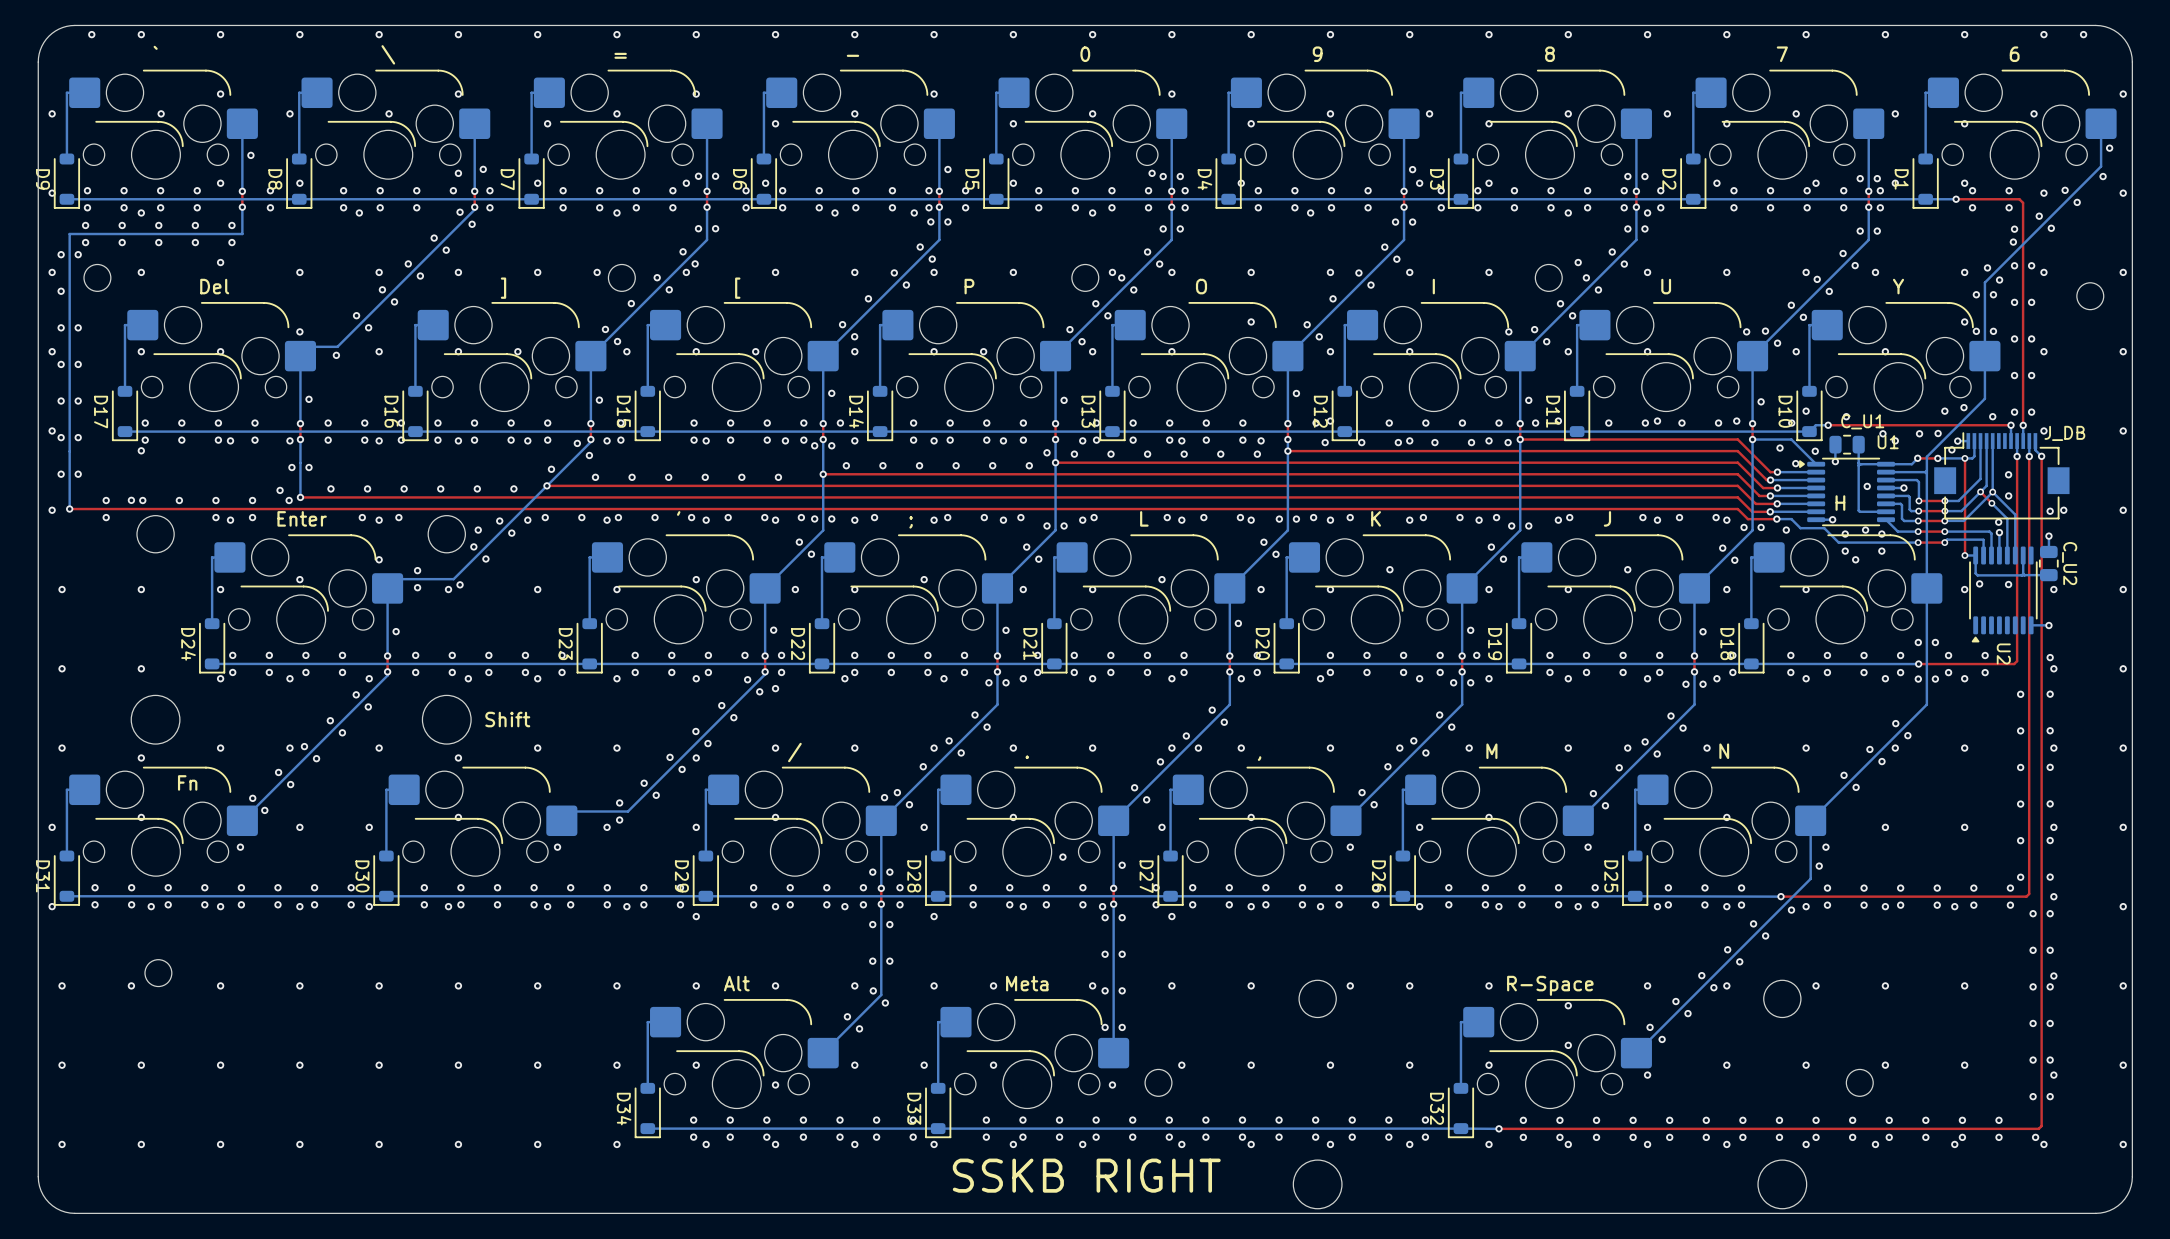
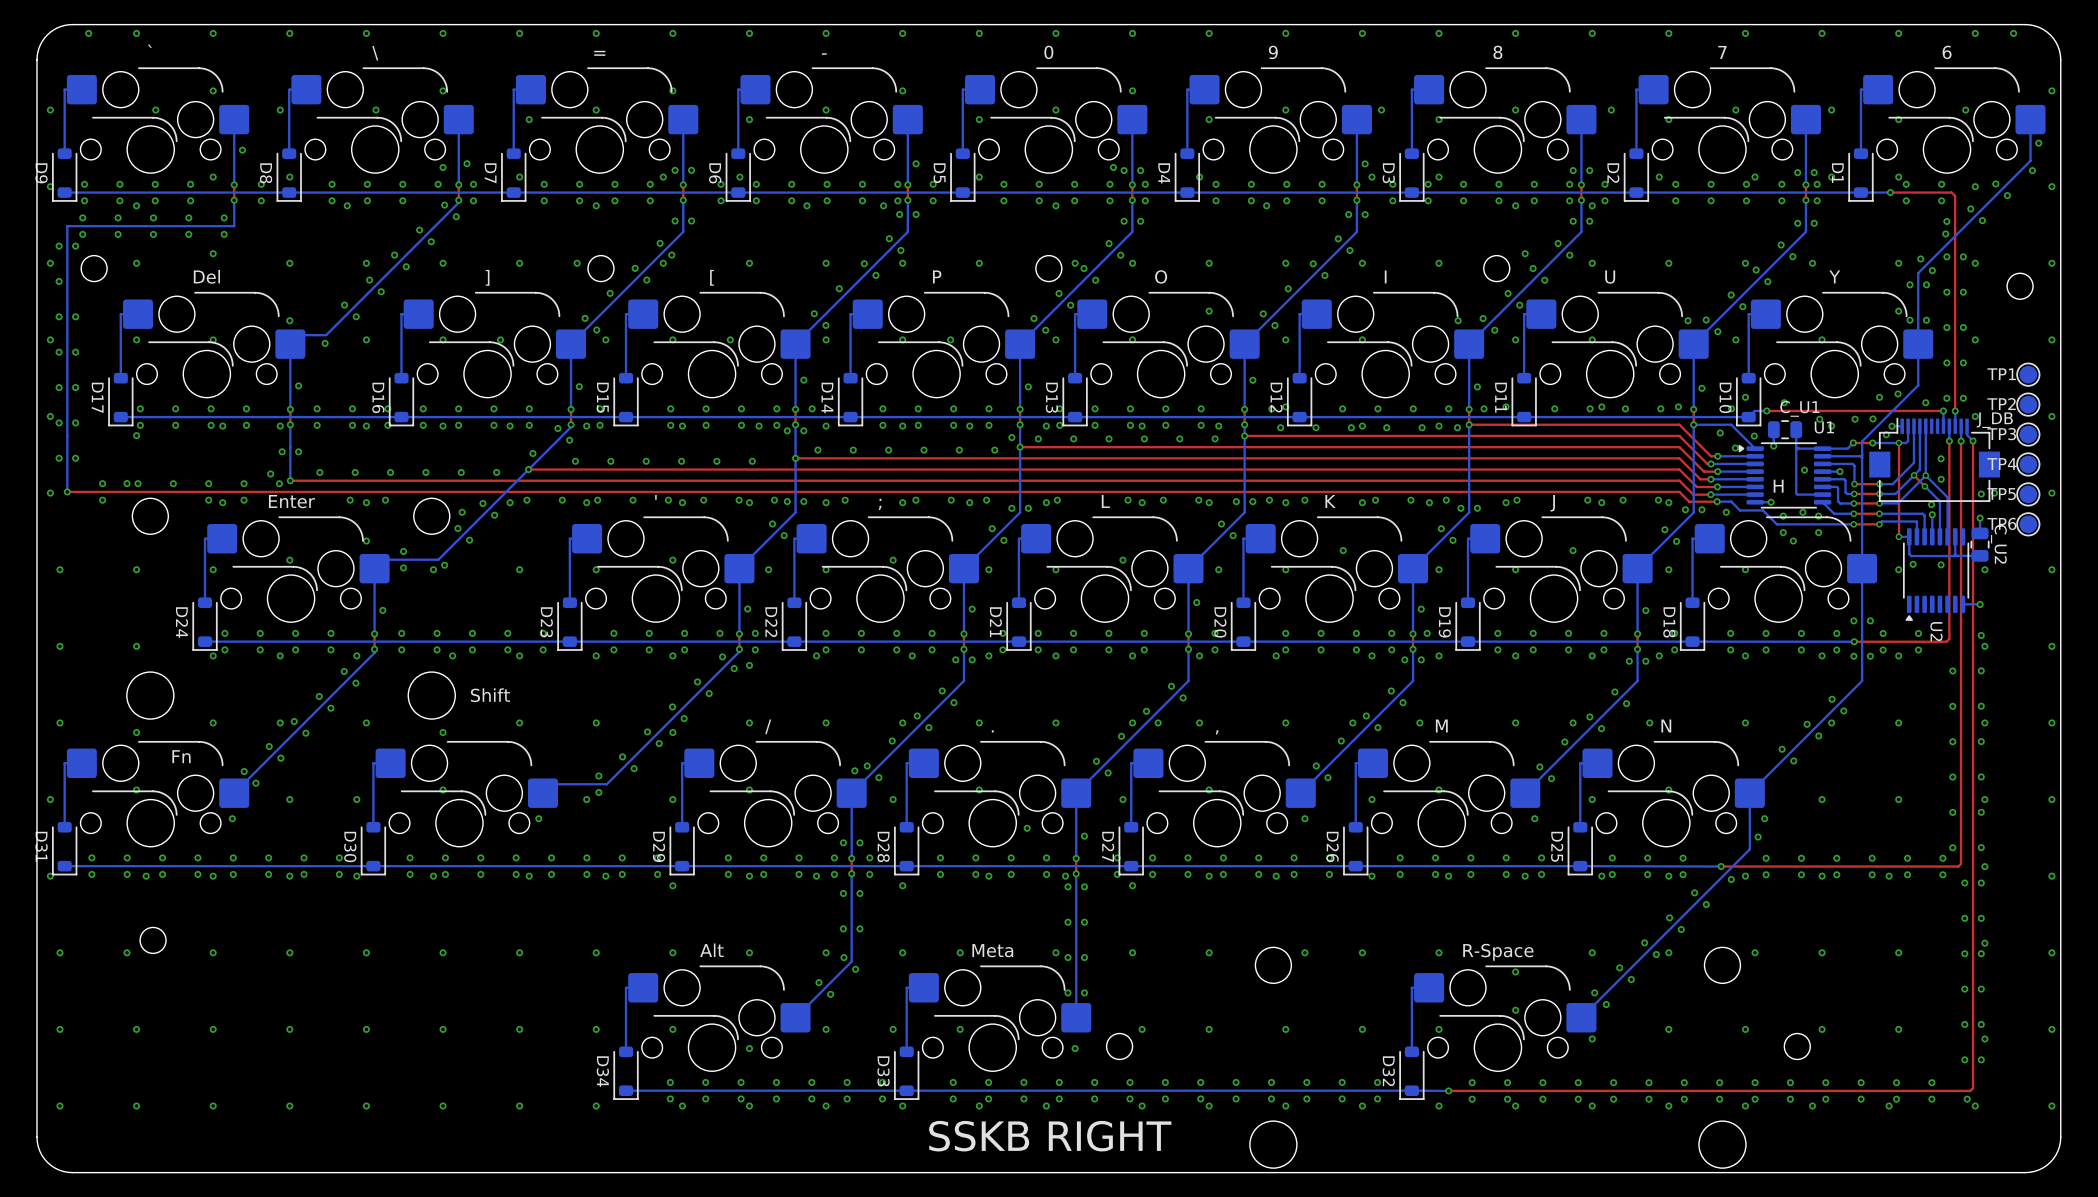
TP1: none -> (2028, 374)
TP2: none -> (2028, 404)
TP3: none -> (2028, 434)
TP4: none -> (2028, 464)
TP5: none -> (2028, 494)
TP6: none -> (2028, 524)

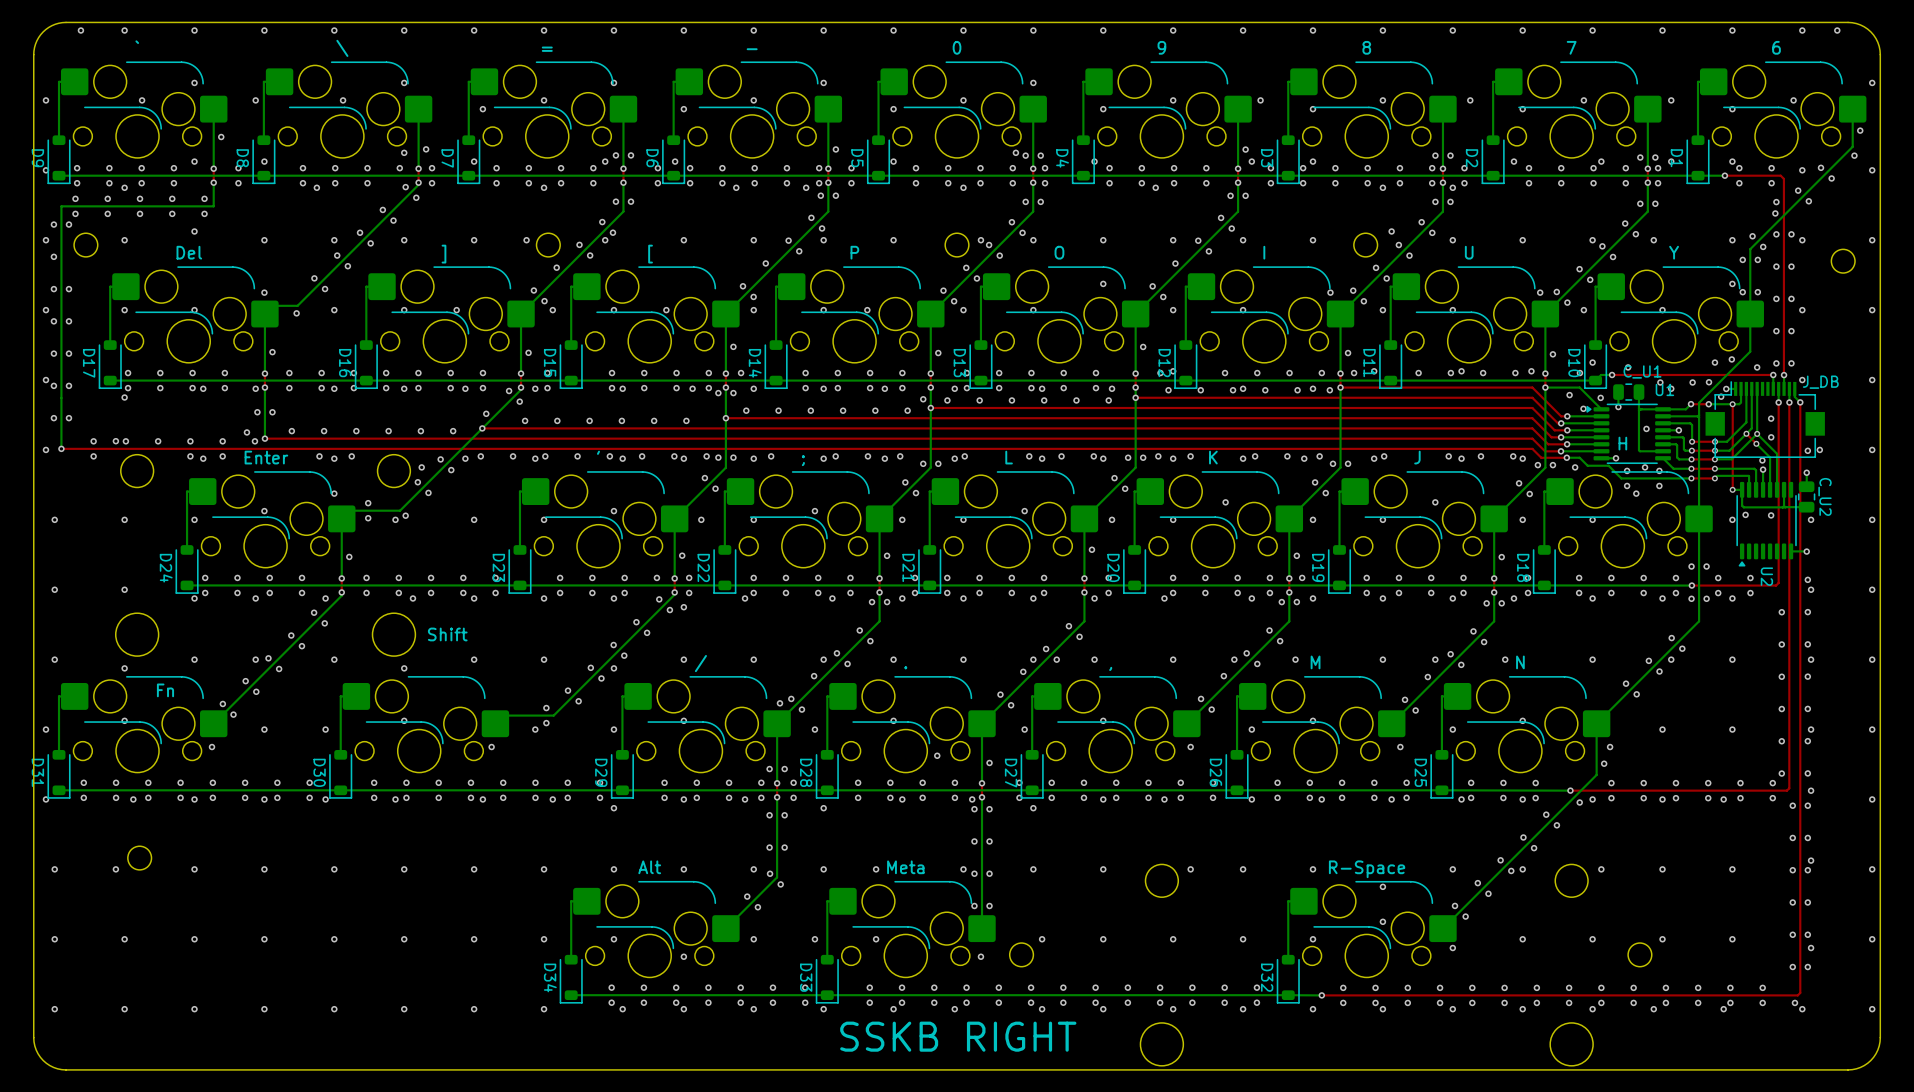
TP1: (2028, 374) -> none
TP2: (2028, 404) -> none
TP3: (2028, 434) -> none
TP4: (2028, 464) -> none
TP5: (2028, 494) -> none
TP6: (2028, 524) -> none

